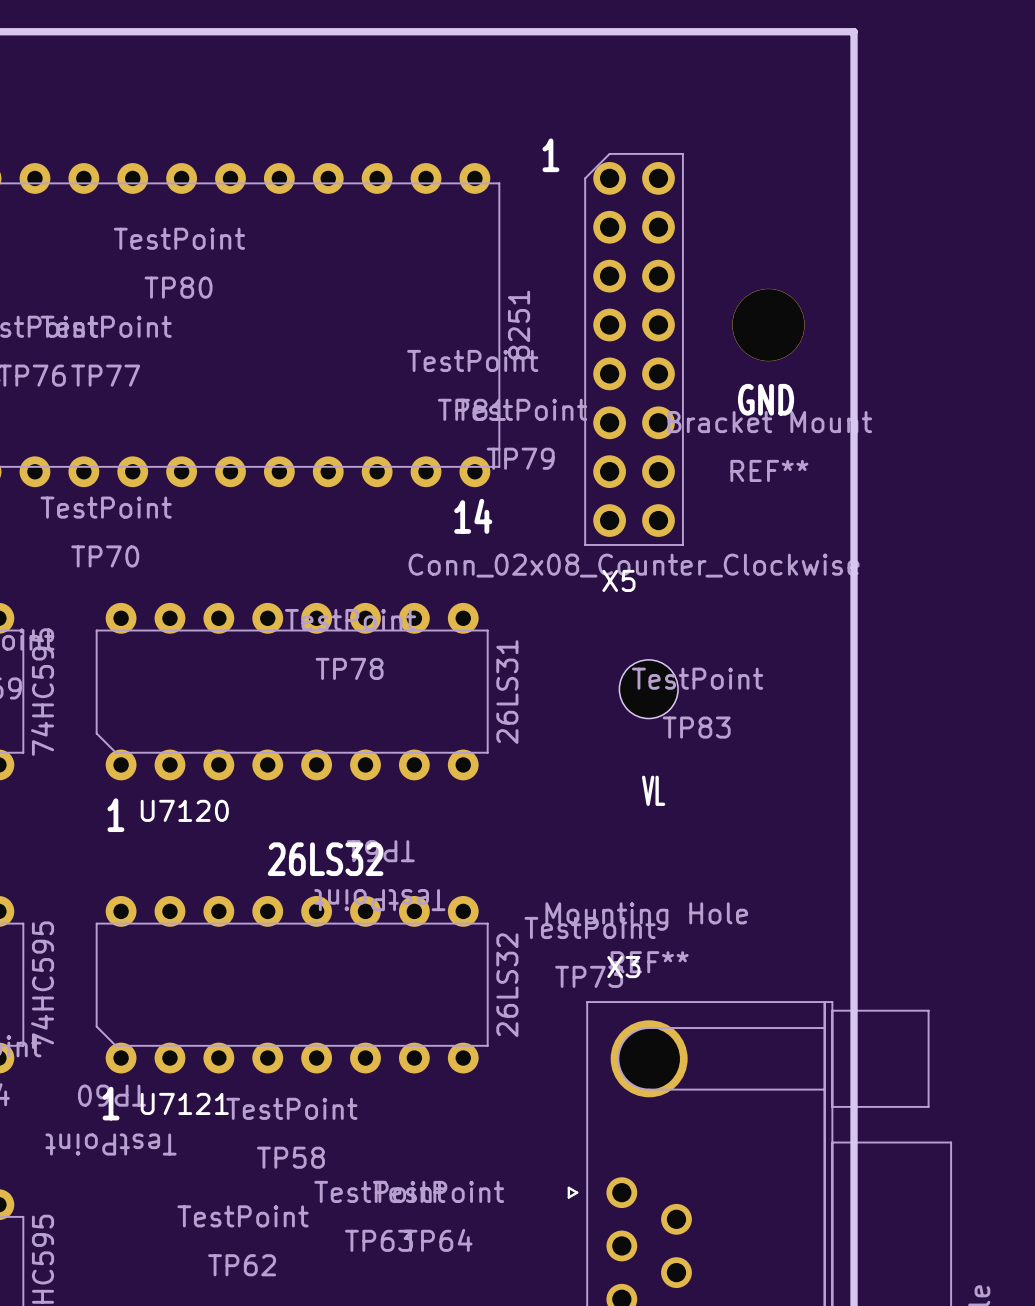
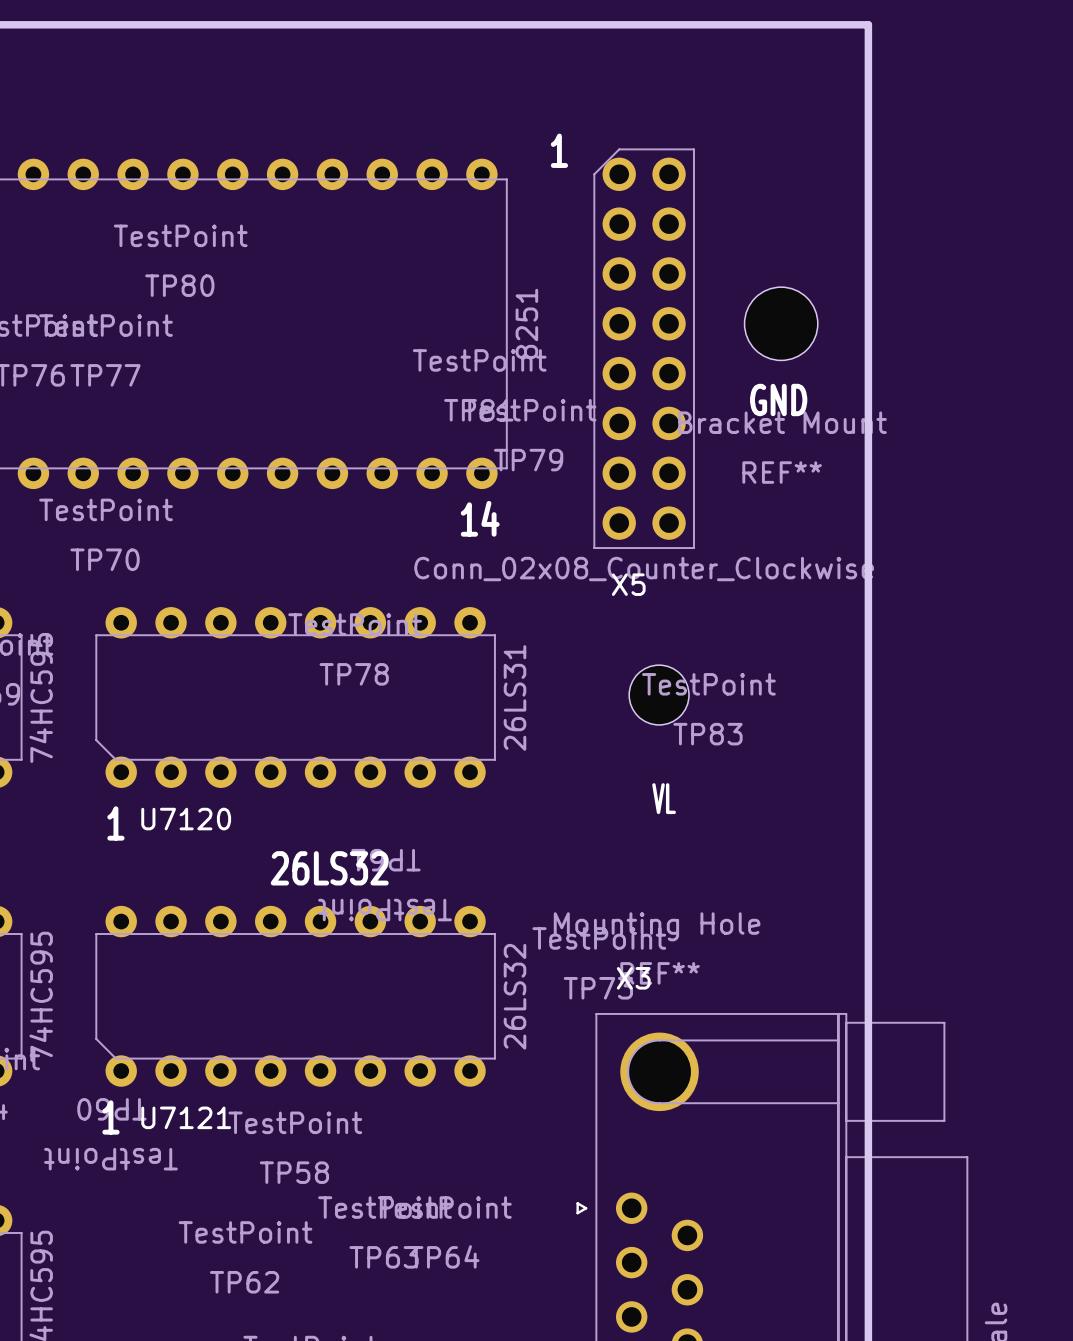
REF** footprint: [732, 288, 805, 362] -> [744, 287, 818, 361]

